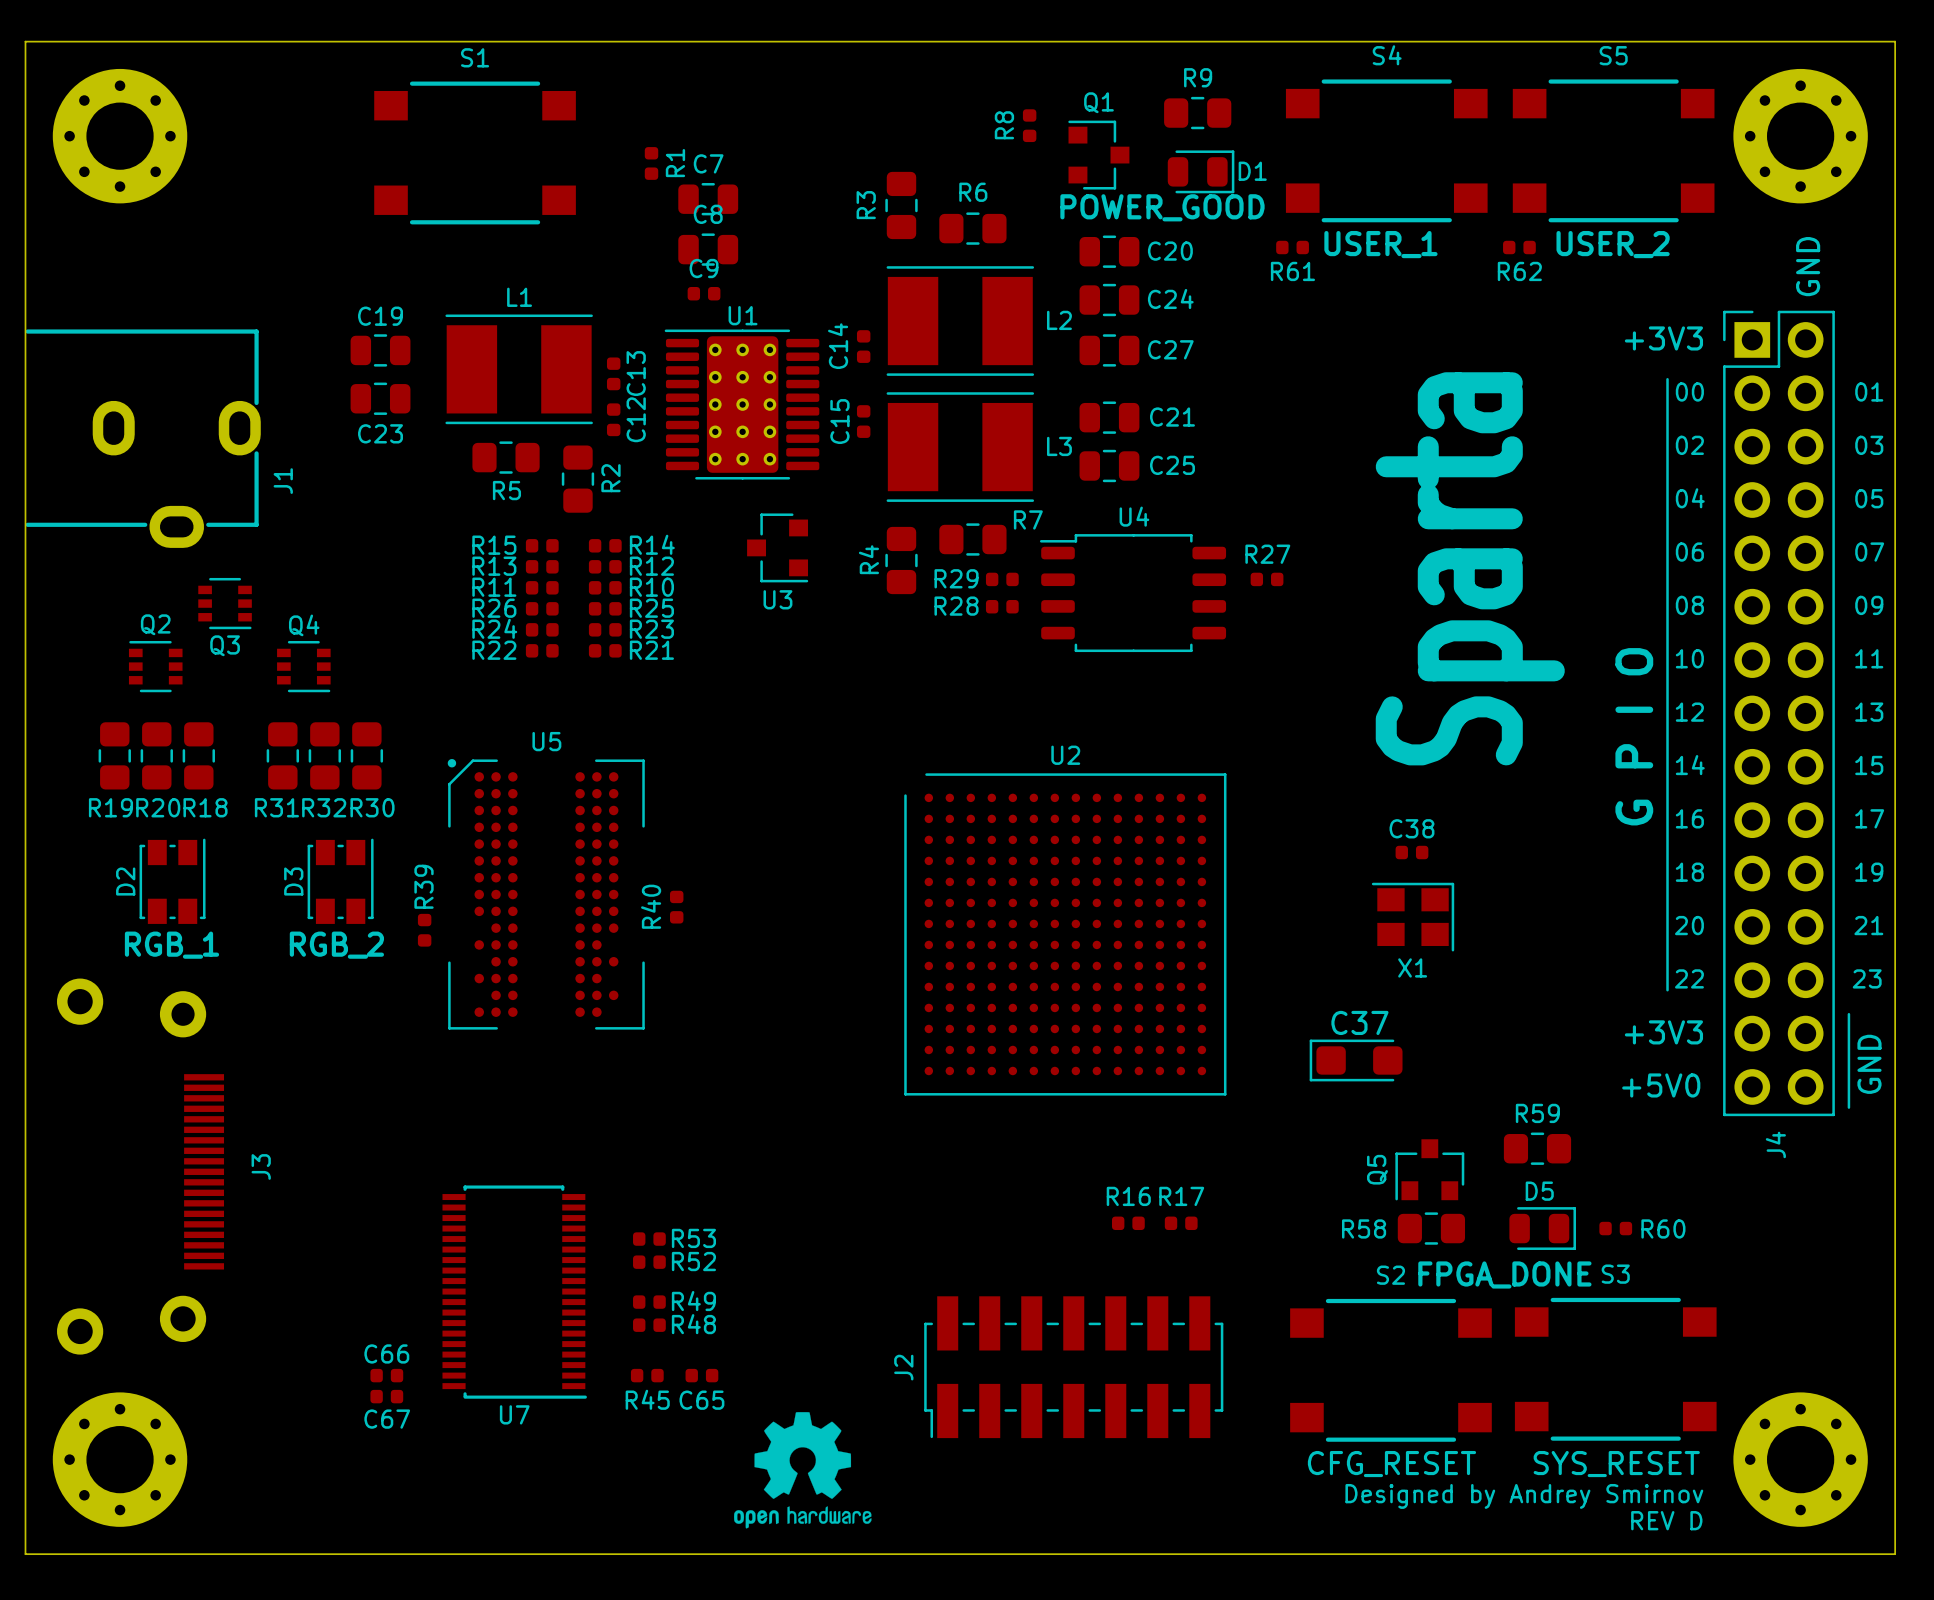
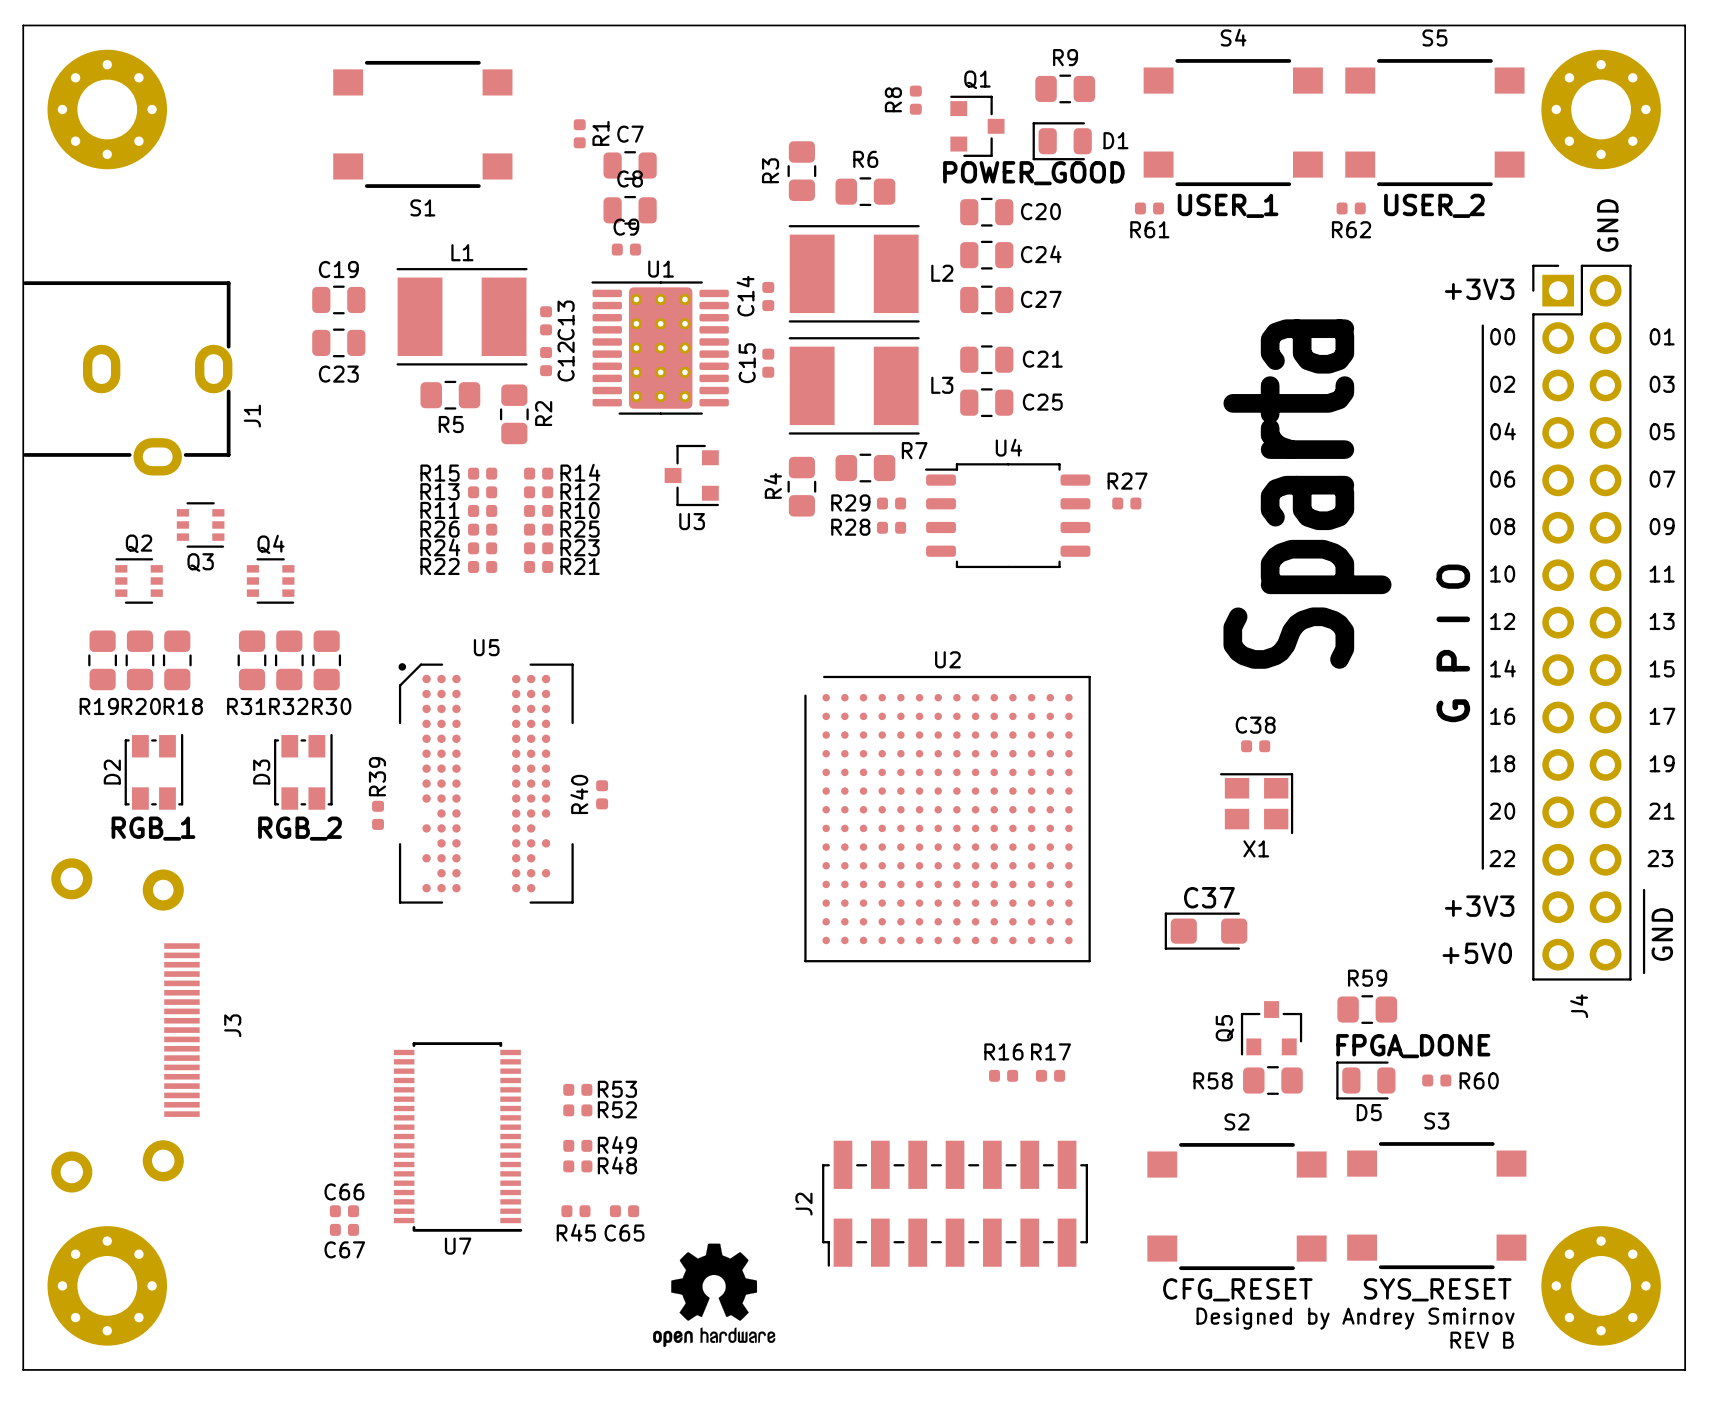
S1 name position: S1 (475, 57) -> S1 (422, 207)
D1 rotation: 0° (1201, 171) -> 180° (1062, 141)
D5 rotation: 0° (1542, 1228) -> 180° (1365, 1080)
text position: FPGA_DONE (1504, 1274) -> FPGA_DONE (1413, 1046)
text: REV D (1666, 1520) -> REV B (1482, 1340)

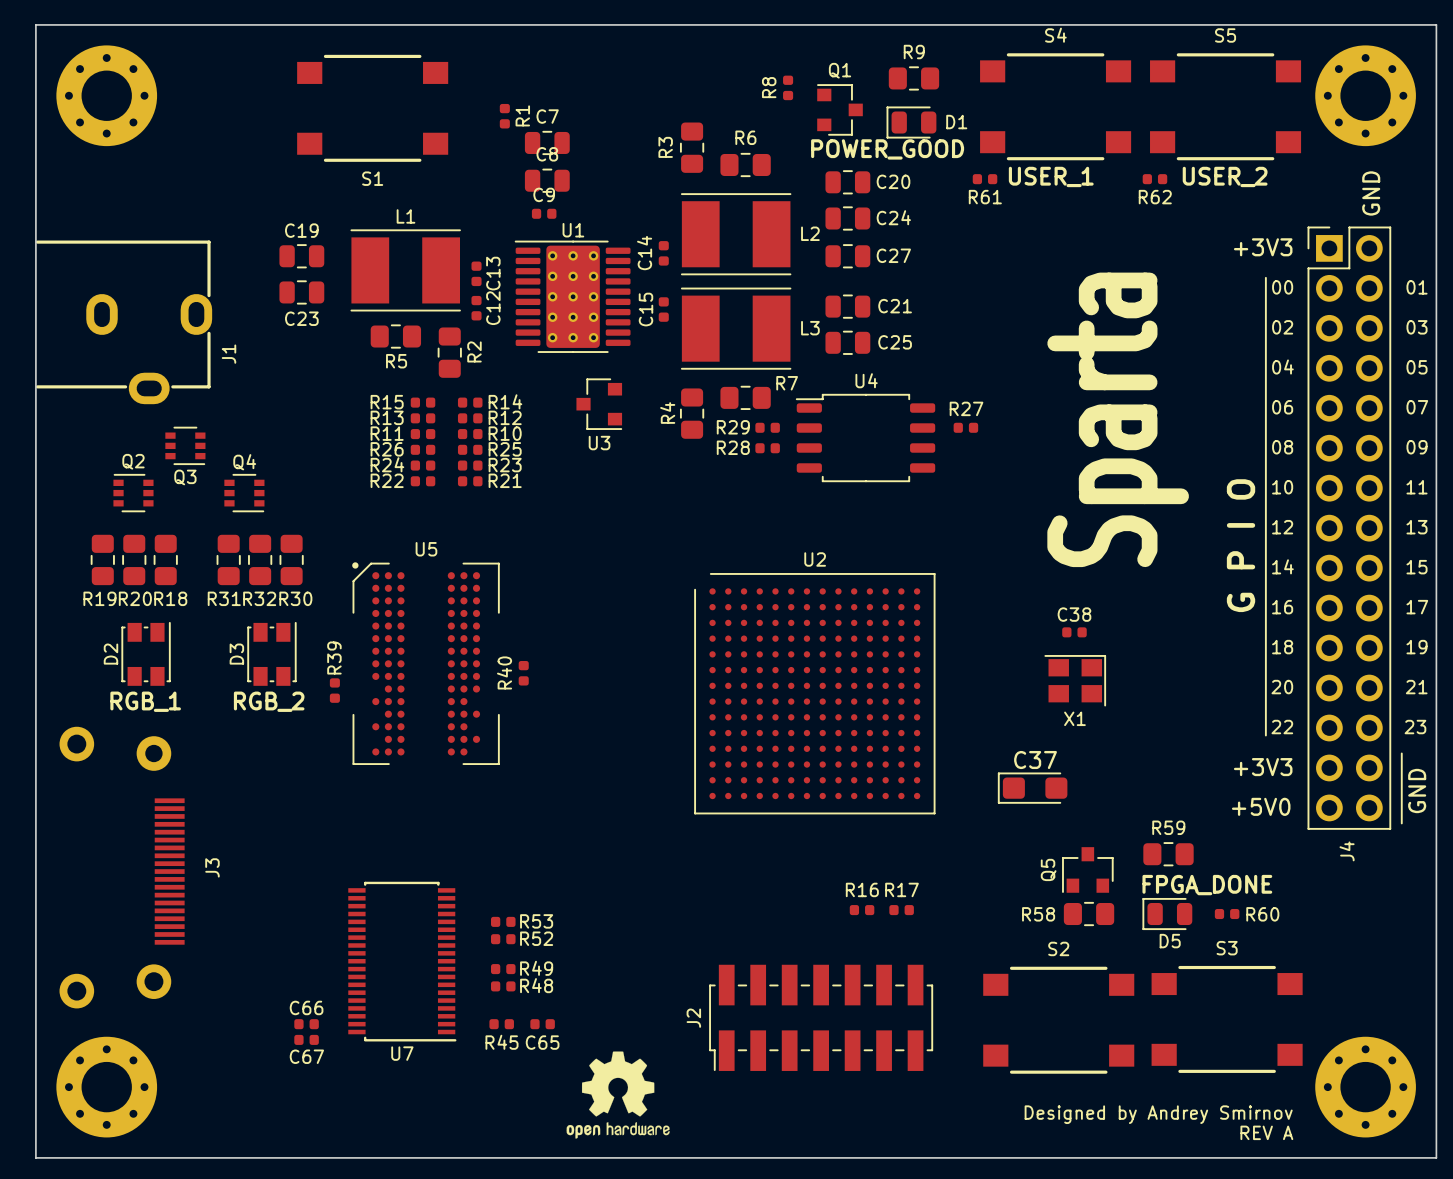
text: CFG_RESET (1237, 1289) -> none
text: SYS_RESET (1437, 1289) -> none
text: REV B (1482, 1340) -> REV A (1266, 1132)

